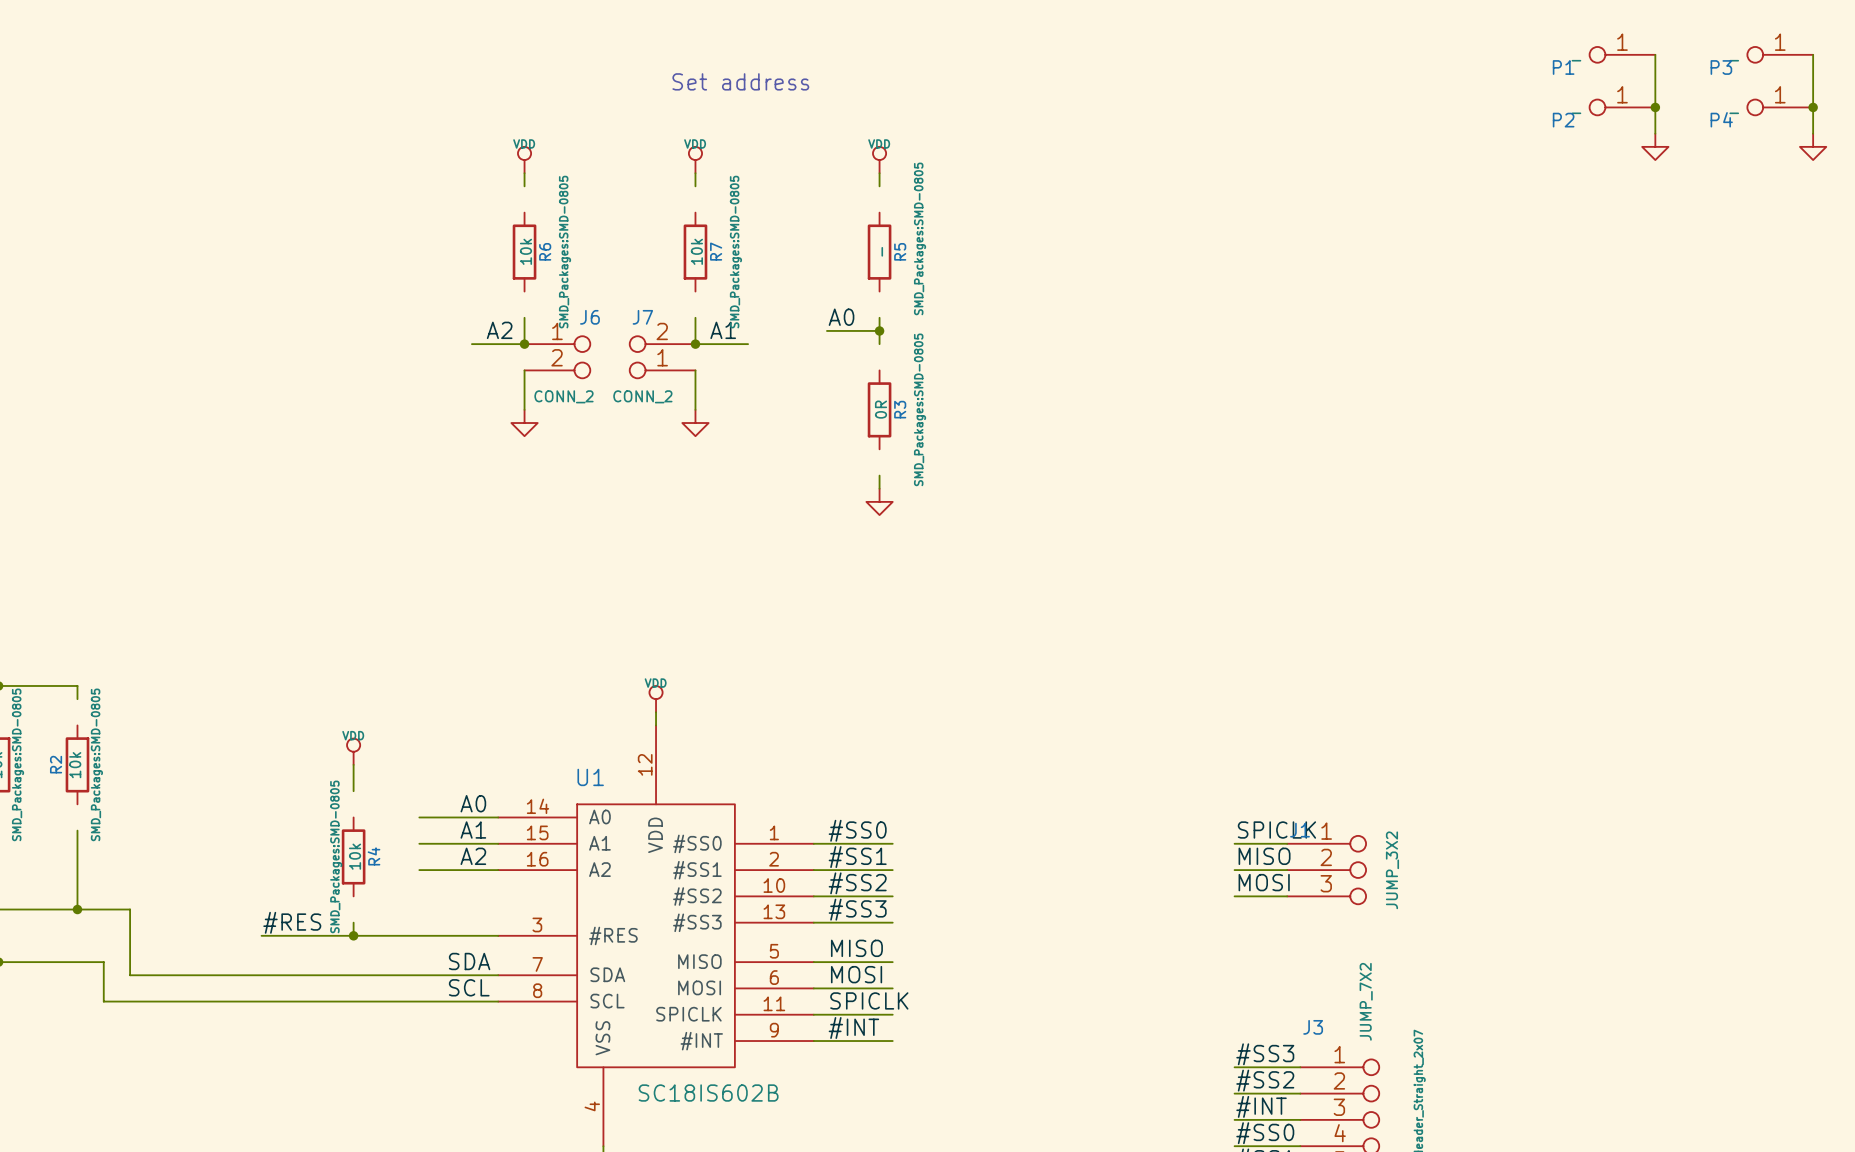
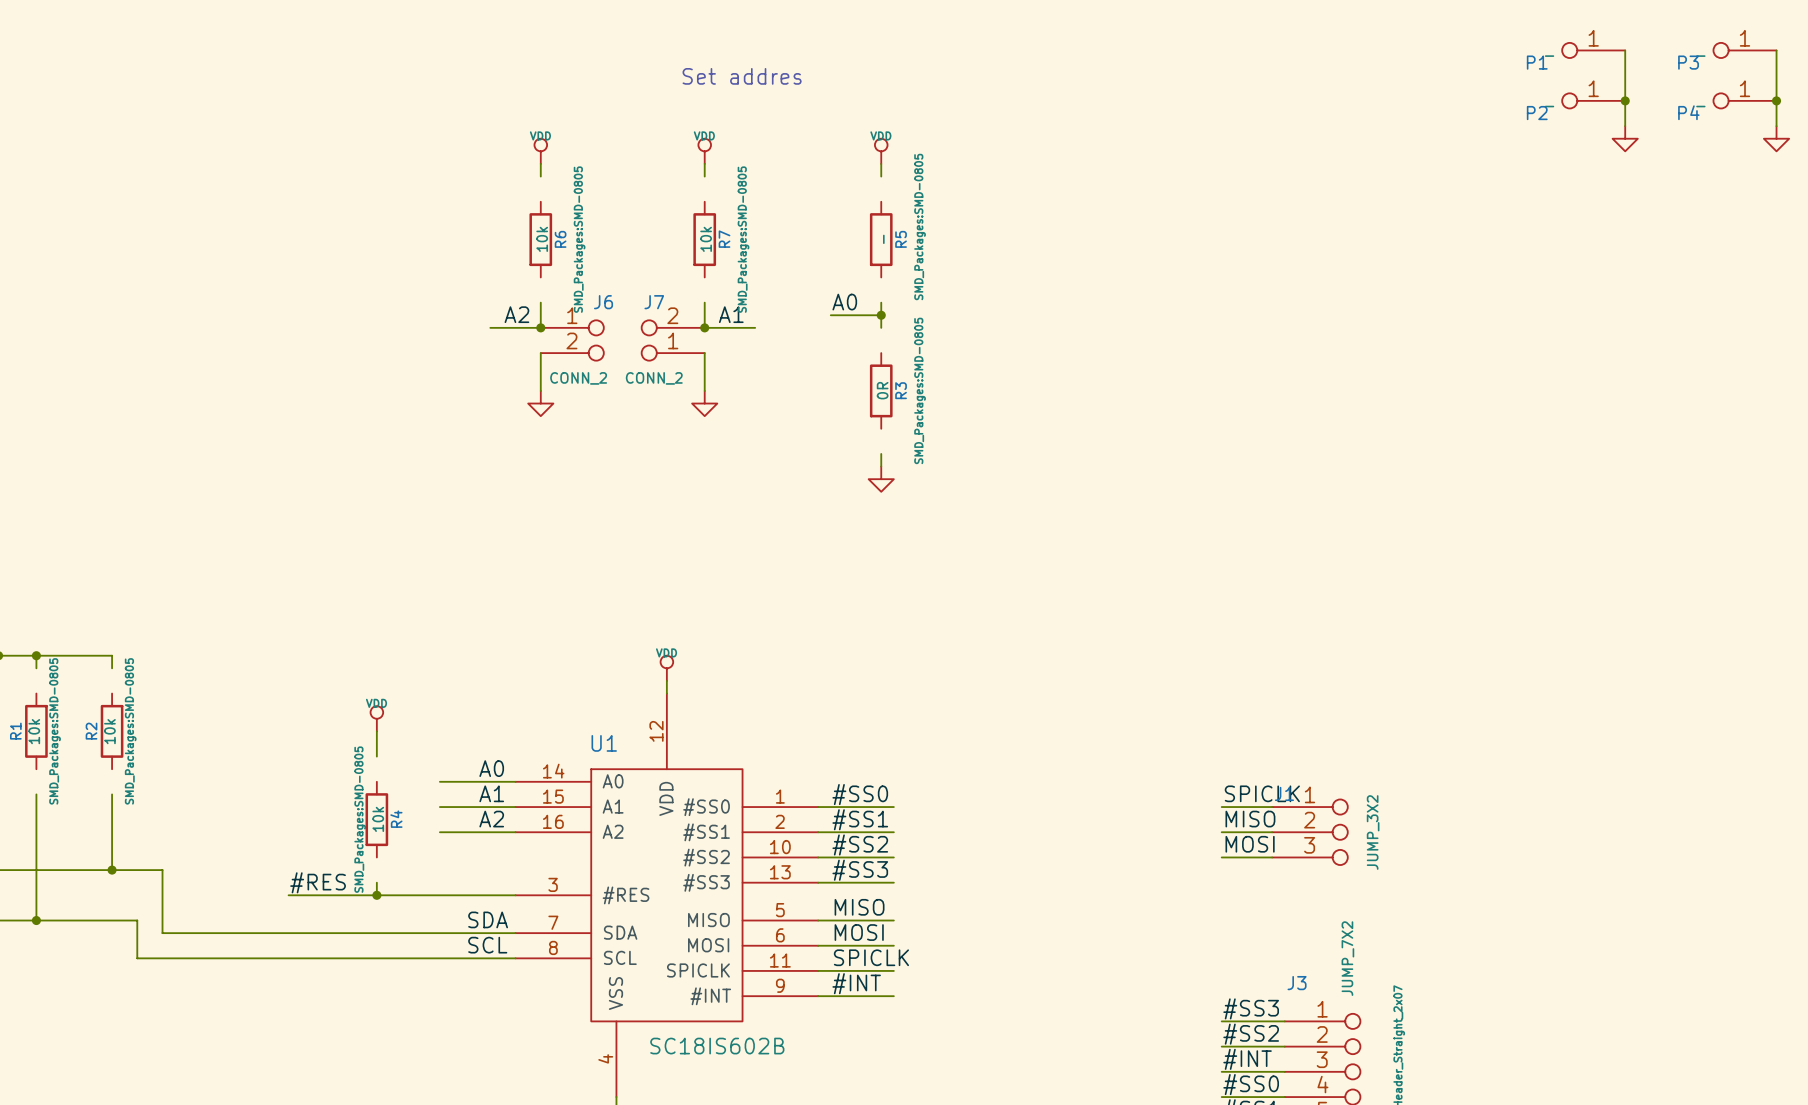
text: Set address (740, 81) -> Set addres (742, 76)

